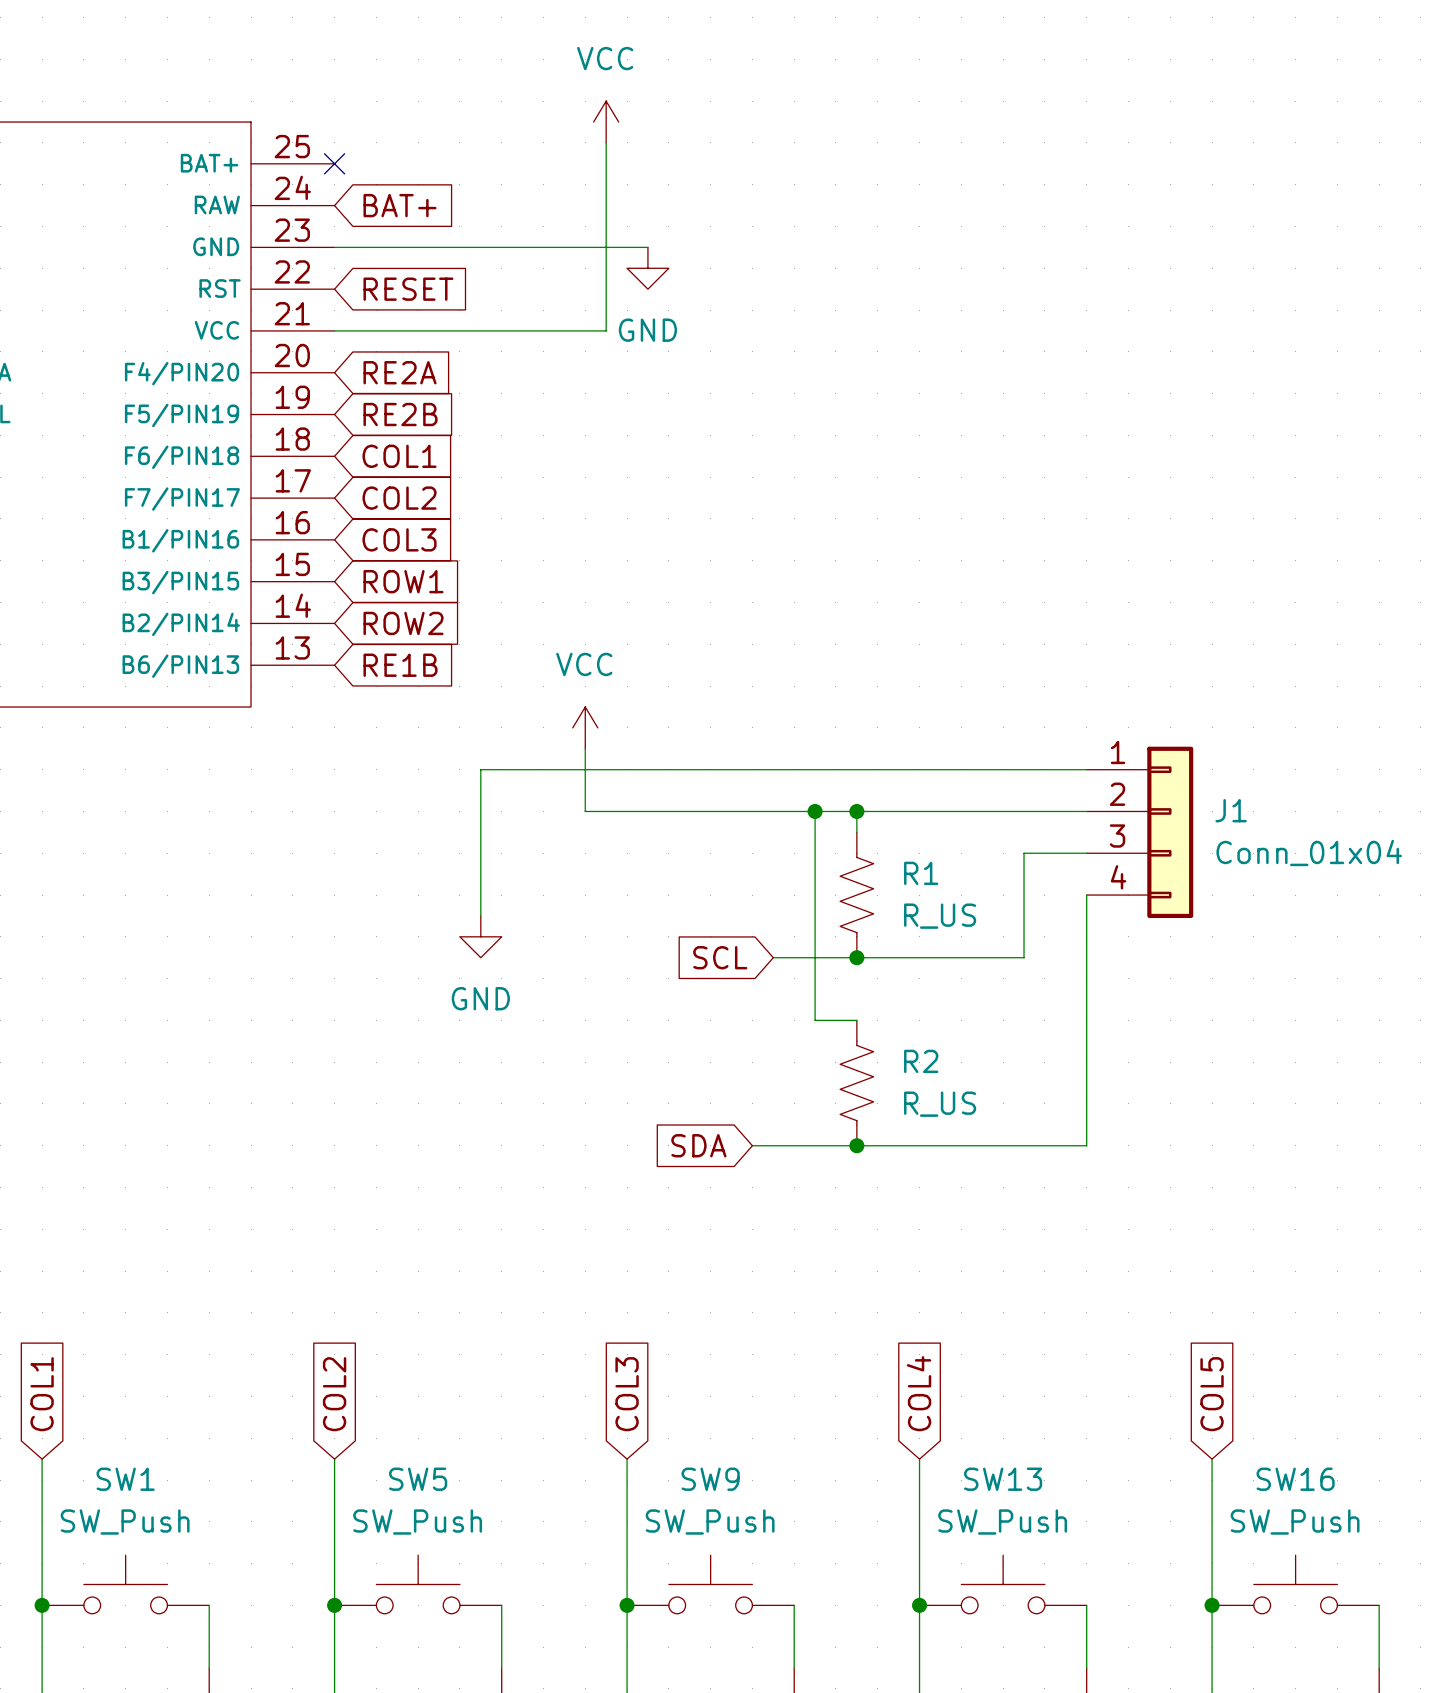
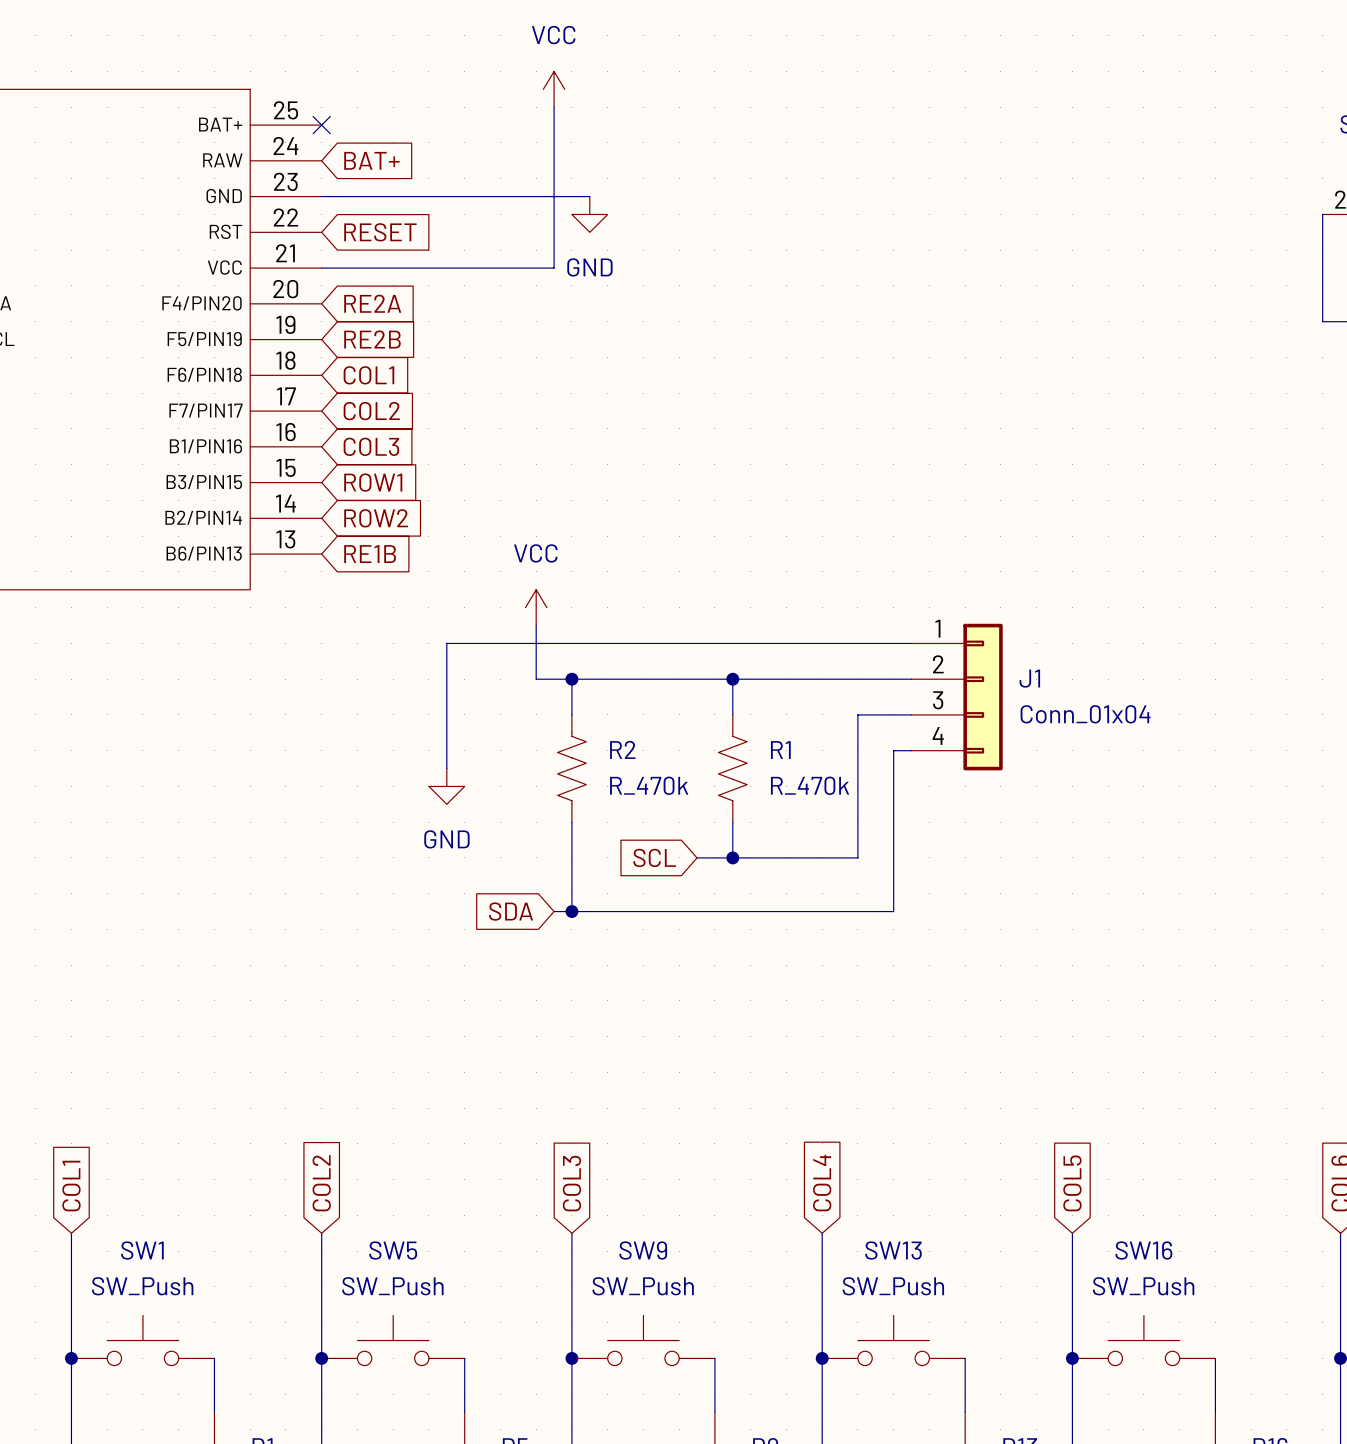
wire: none -> (571, 679) (571, 714)
junction: none -> (571, 679)
wire: (856, 811) (856, 832) -> none
junction: (856, 811) -> none
J1 position: (1139, 832) -> (957, 697)
wire: (815, 853) (815, 978) -> none
wire: none -> (911, 714) (857, 714) (857, 857) (768, 857)
wire: (1086, 853) (1024, 853) (1024, 957) (773, 957) -> none
R1 position: (856, 895) -> (732, 768)
wire: none -> (911, 750) (893, 750) (893, 911) (554, 911)
wire: (1086, 895) (1086, 1145) (752, 1145) -> none
R1 value: R_US (940, 916) -> R_470k (810, 785)
global label position: SCL (720, 957) -> SCL (654, 857)
junction: (856, 957) -> none
wire: none -> (571, 822) (571, 911)
wire: none -> (697, 857) (732, 857)
junction: none -> (732, 857)
junction: none -> (571, 911)
R2 position: (856, 1083) -> (571, 768)
R2 value: R_US (940, 1104) -> R_470k (649, 785)
global label position: SDA (698, 1145) -> SDA (511, 911)
junction: (856, 1145) -> none

